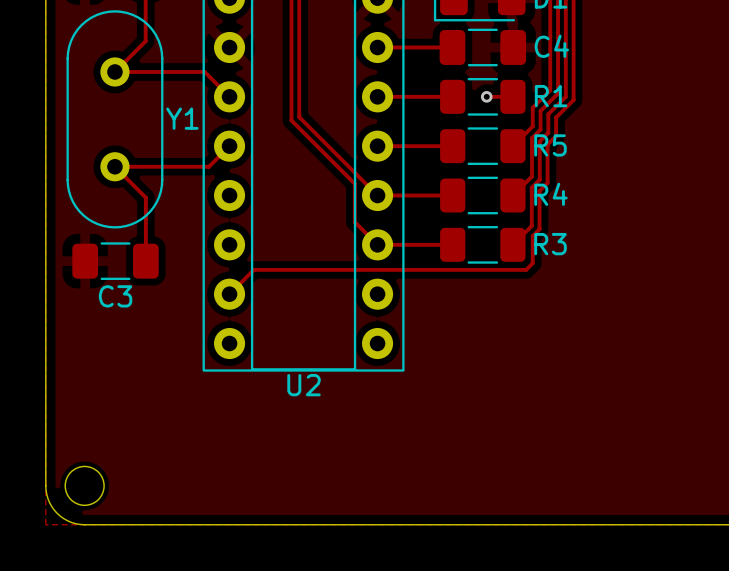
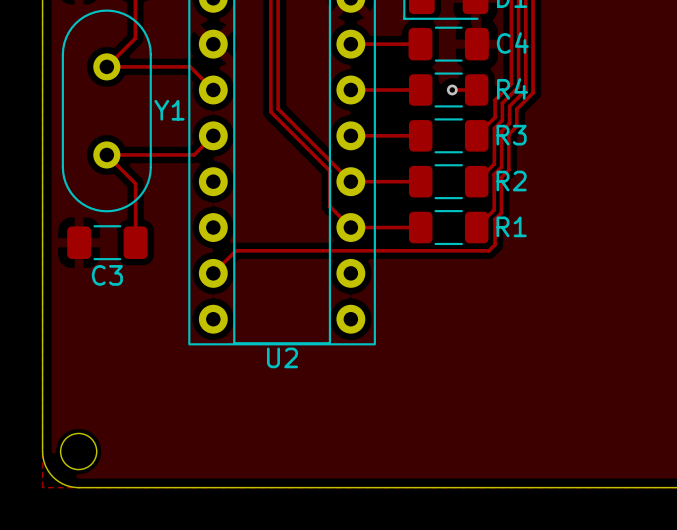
R1 name: R1 (551, 96) -> R4 (512, 88)
R5 name: R5 (550, 145) -> R3 (511, 135)
R4 name: R4 (550, 194) -> R2 (511, 181)
R3 name: R3 (550, 244) -> R1 (511, 226)

